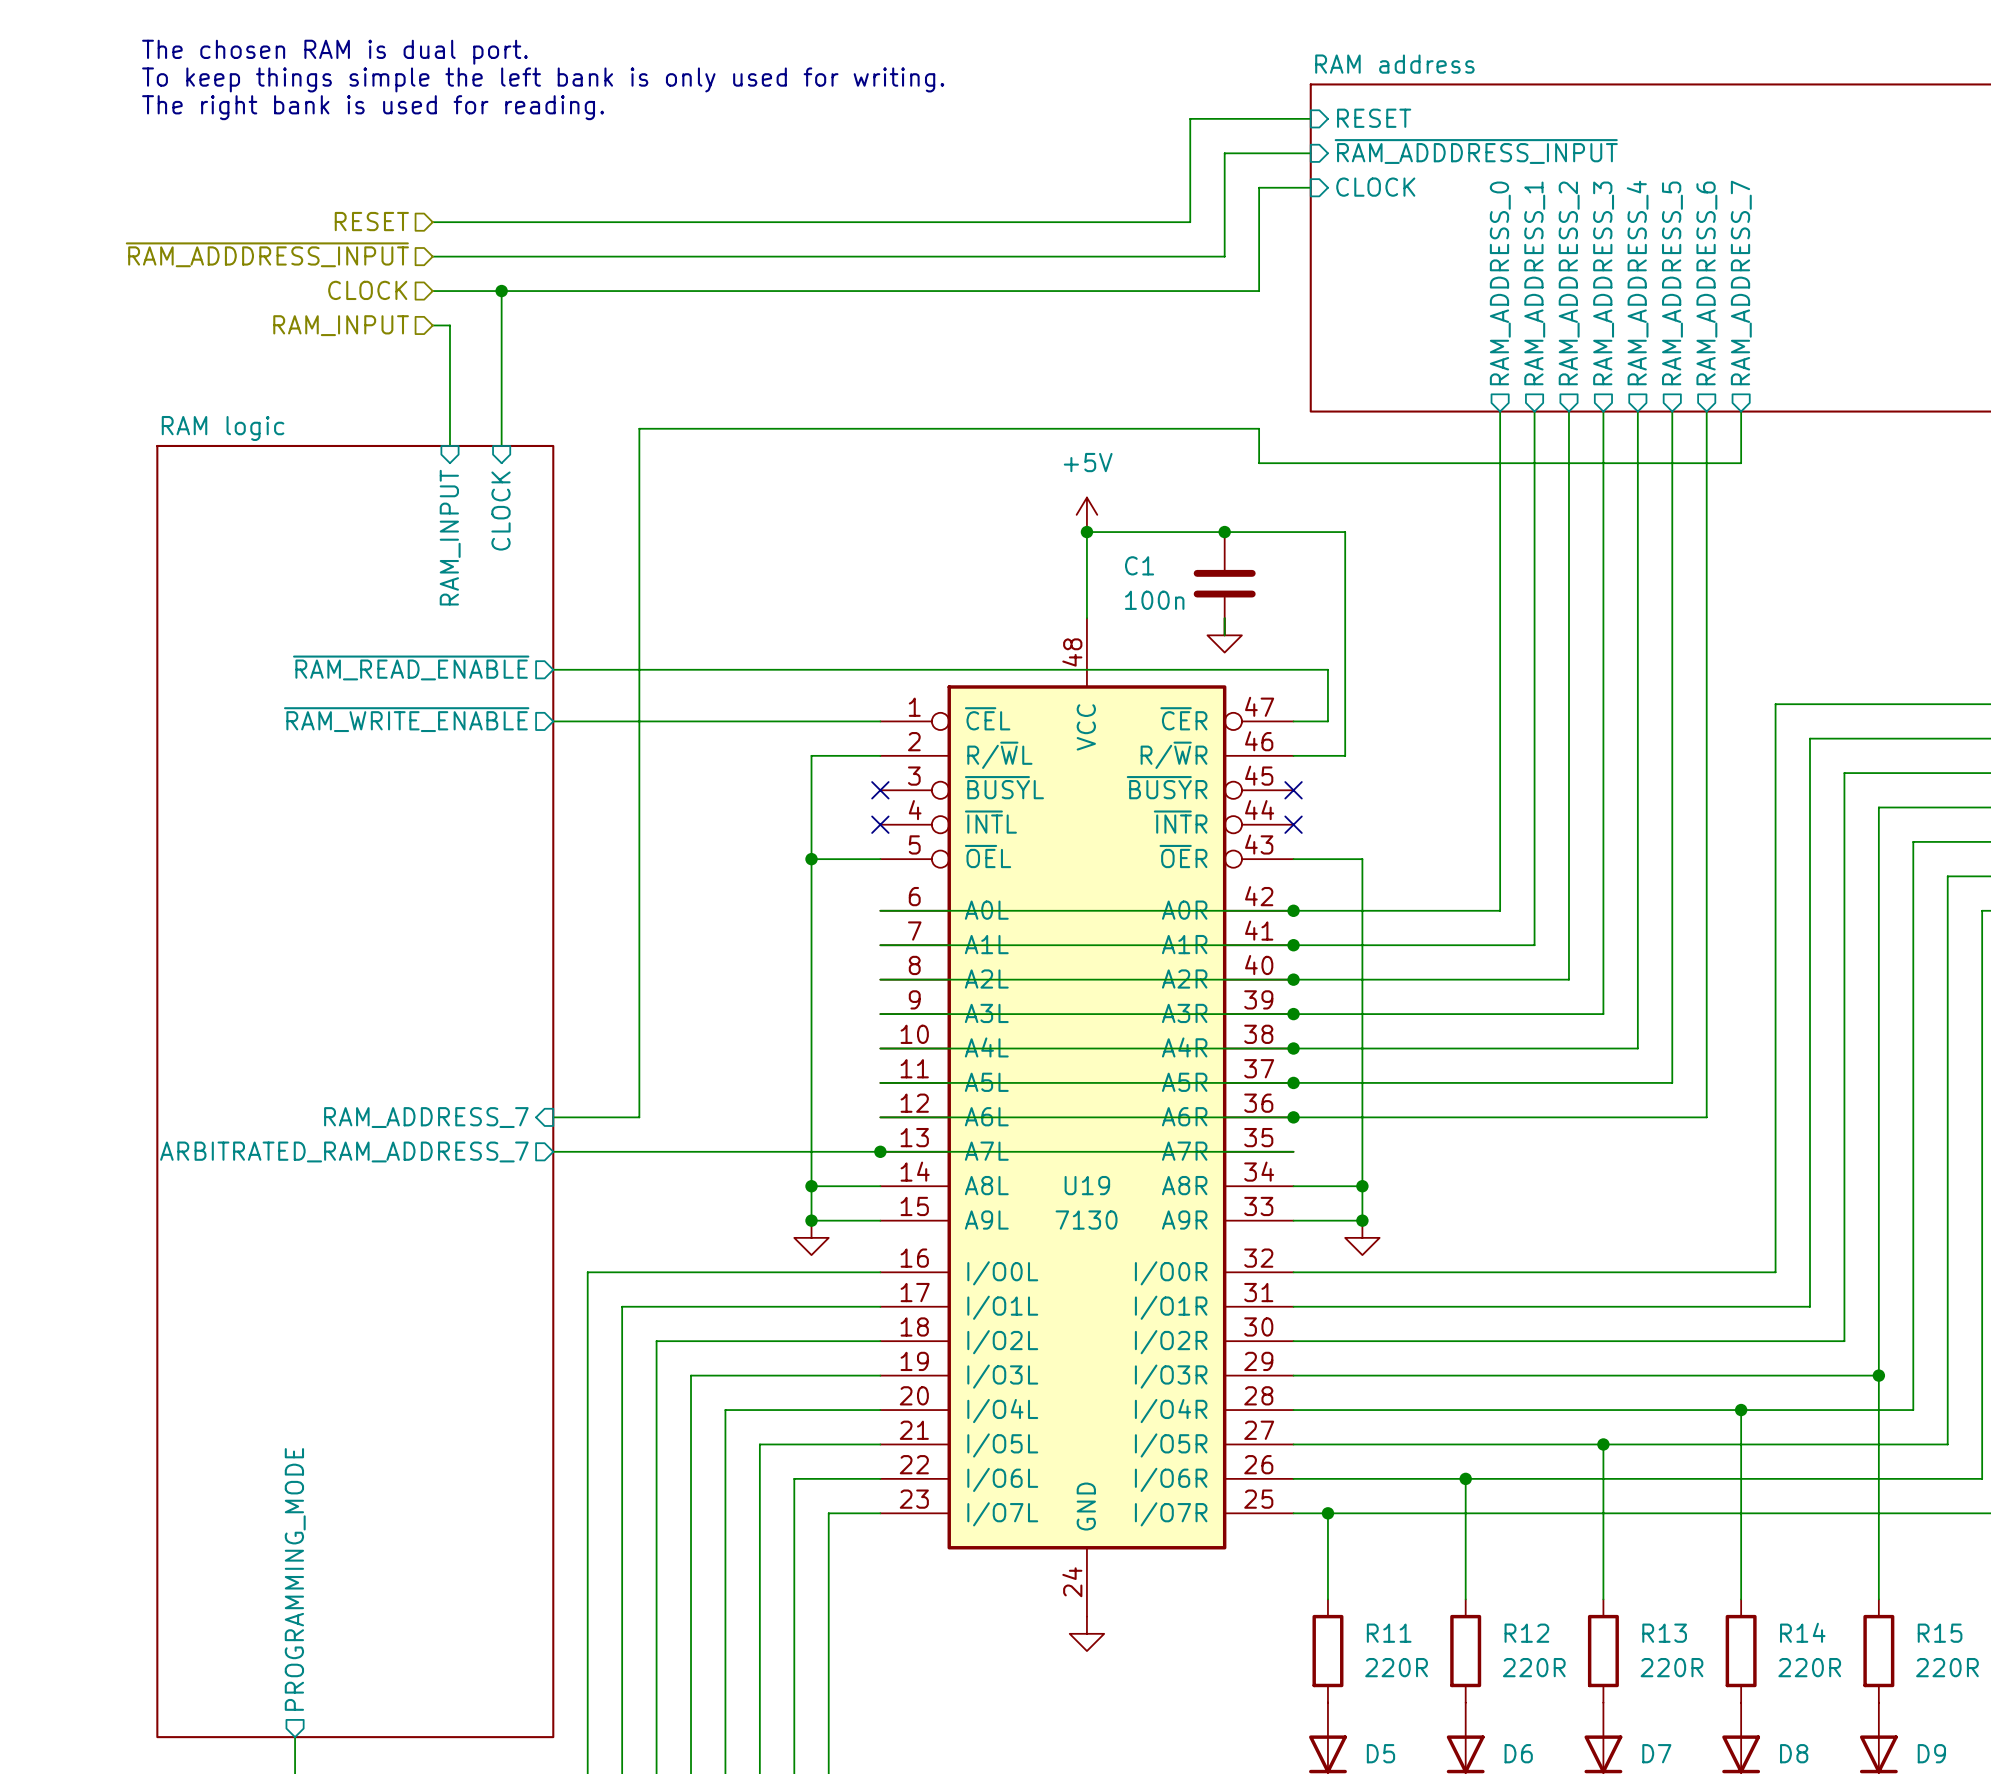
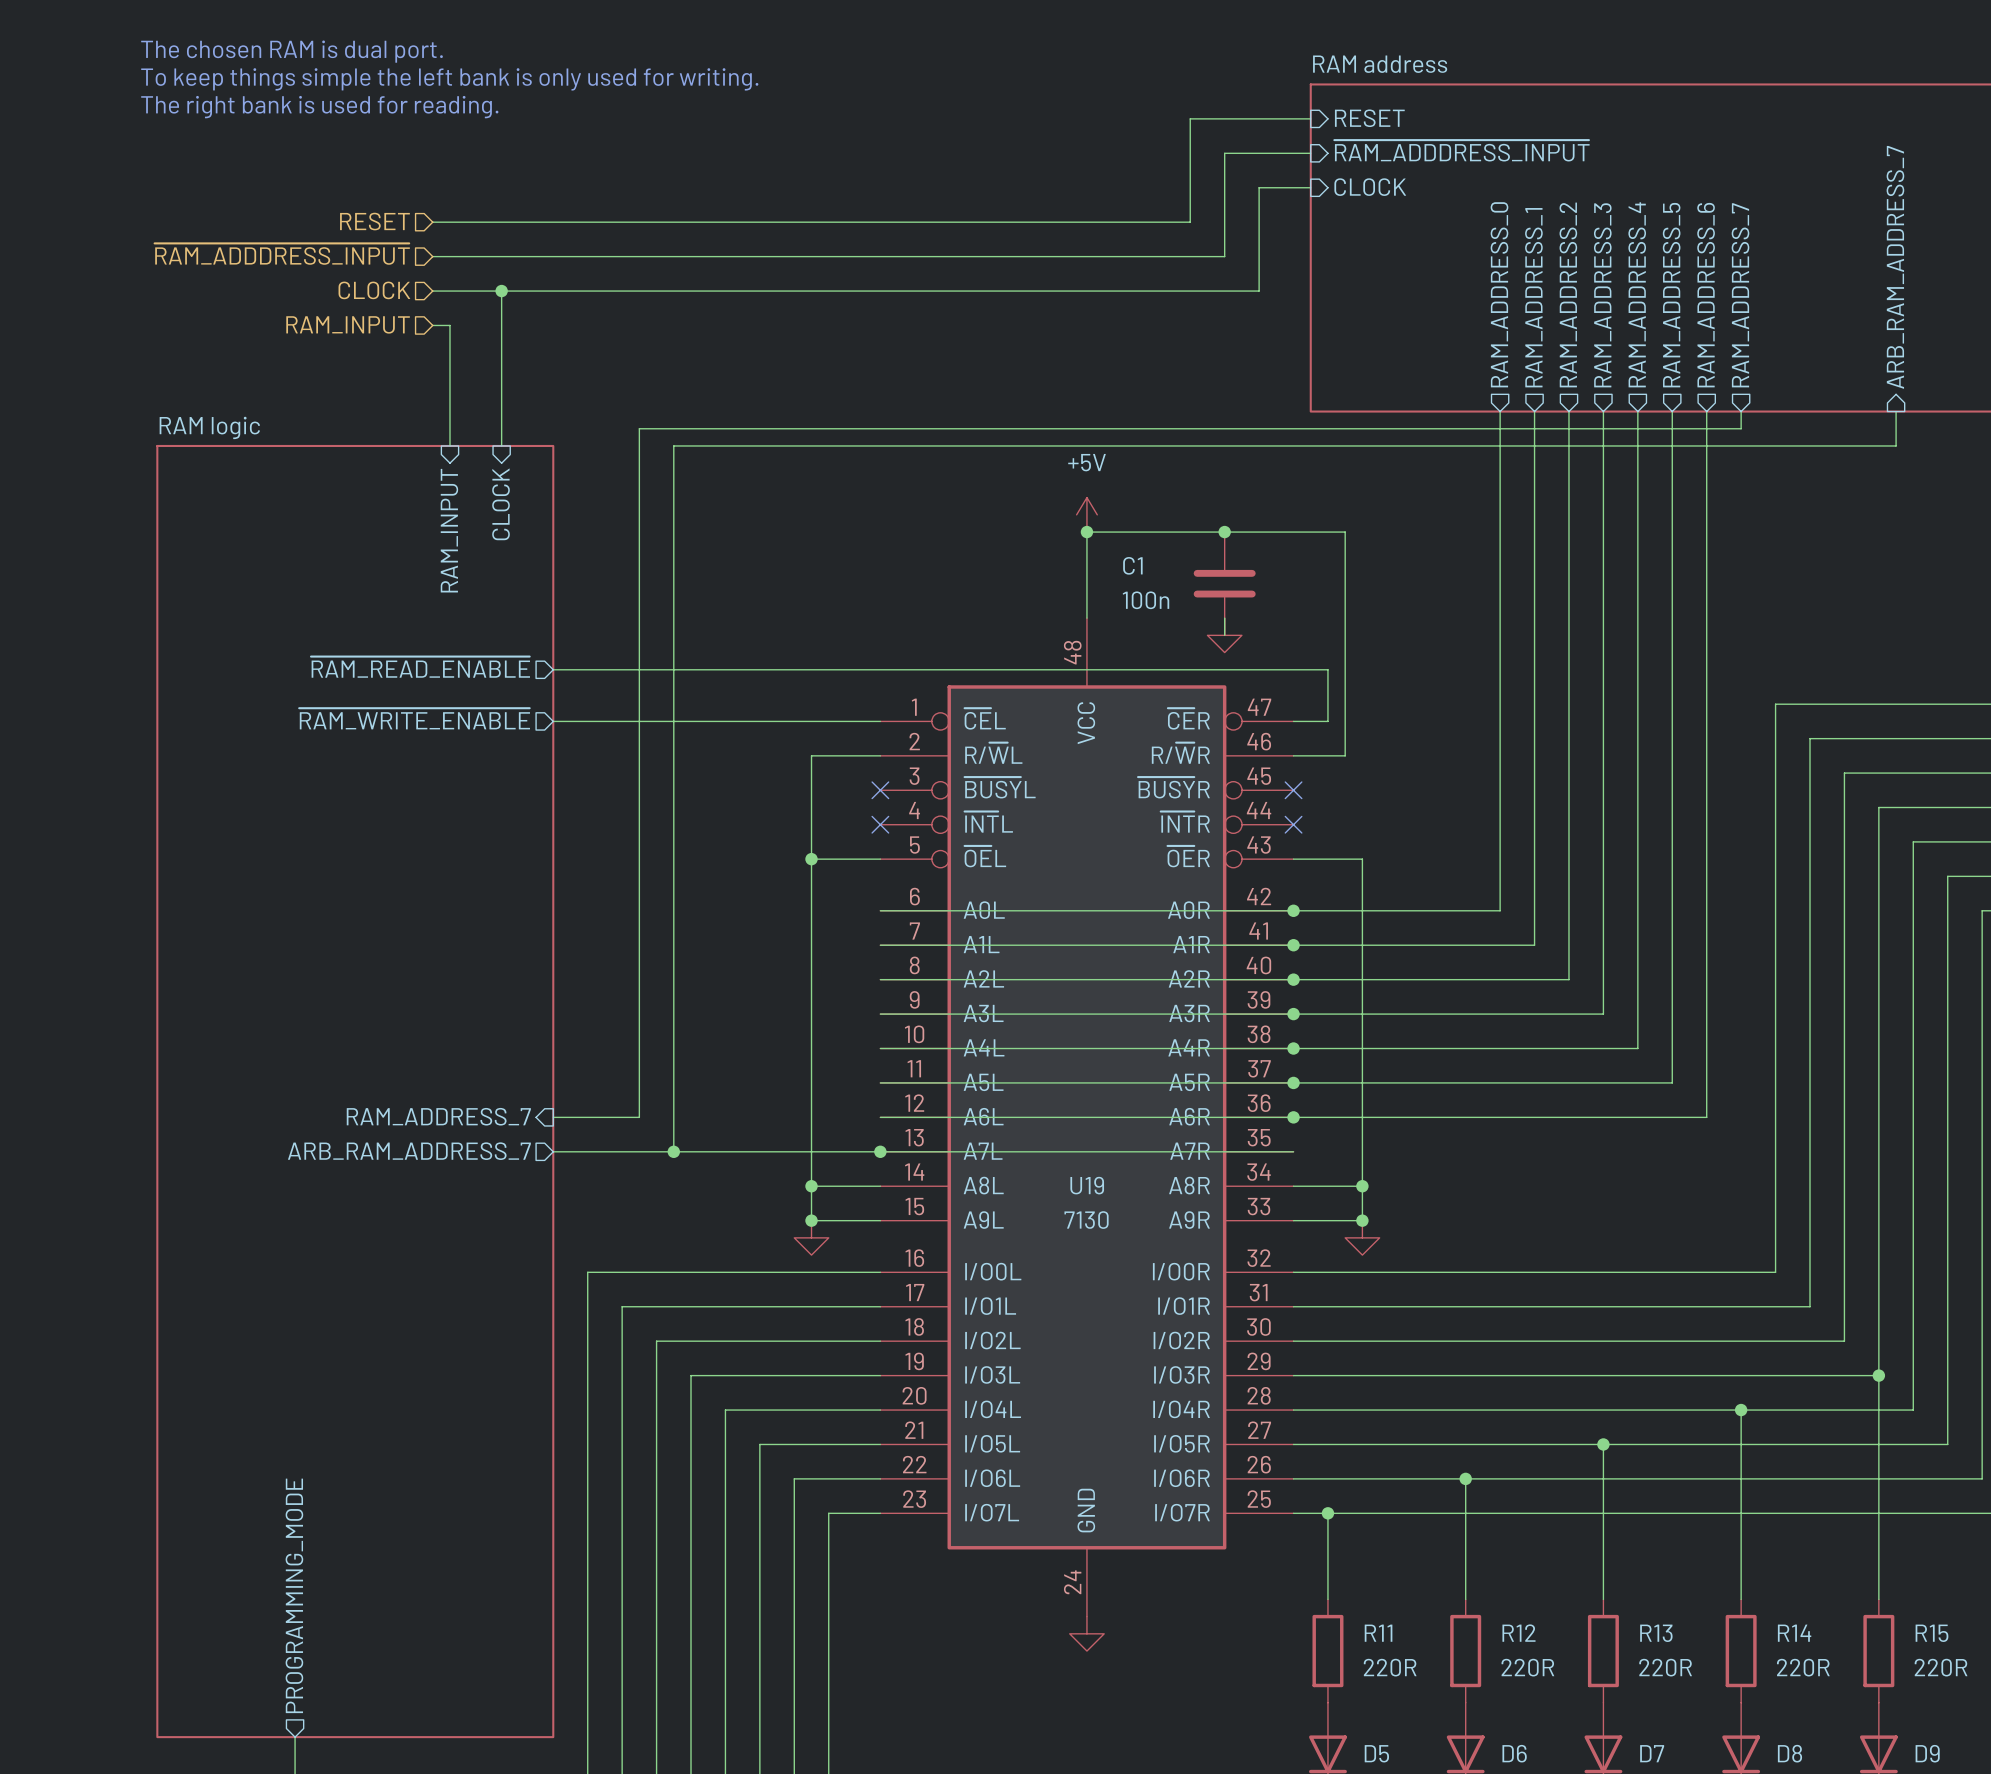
sheet pin: none -> ARB_RAM_ADDRESS_7 (1895, 267)
wire: none -> (1896, 411) (1896, 445) (673, 445) (673, 1151)
wire: (1259, 428) (1259, 463) (1741, 463) (1741, 428) -> (1259, 428) (1741, 428)
sheet pin: ARBITRATED_RAM_ADDRESS_7 (344, 1151) -> ARB_RAM_ADDRESS_7 (409, 1151)
junction: none -> (673, 1151)

